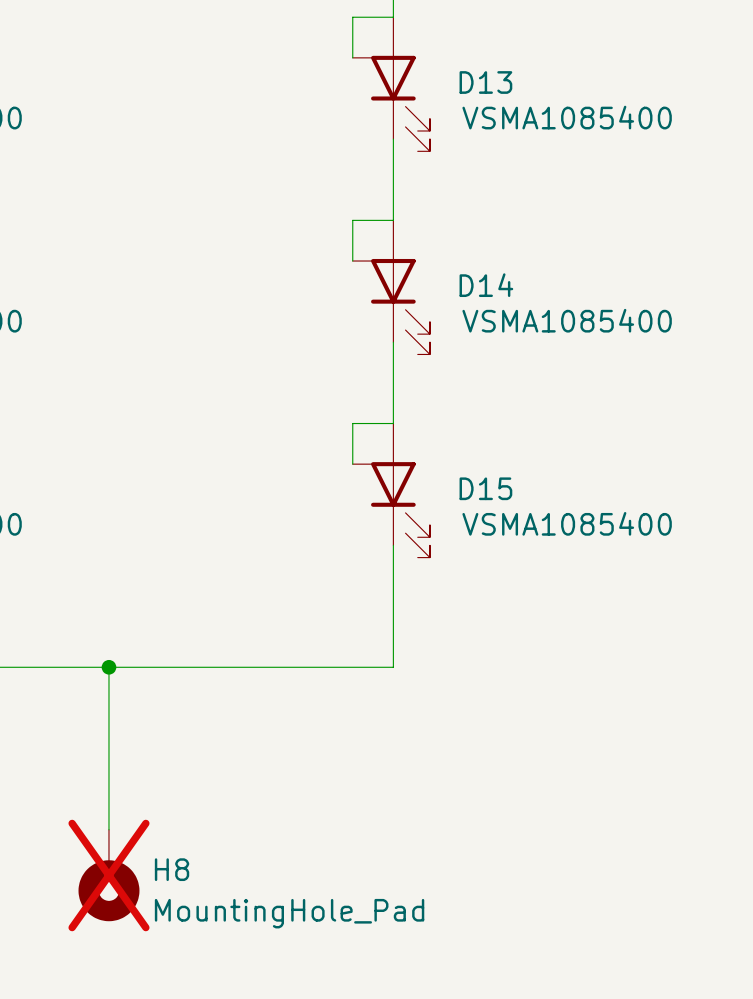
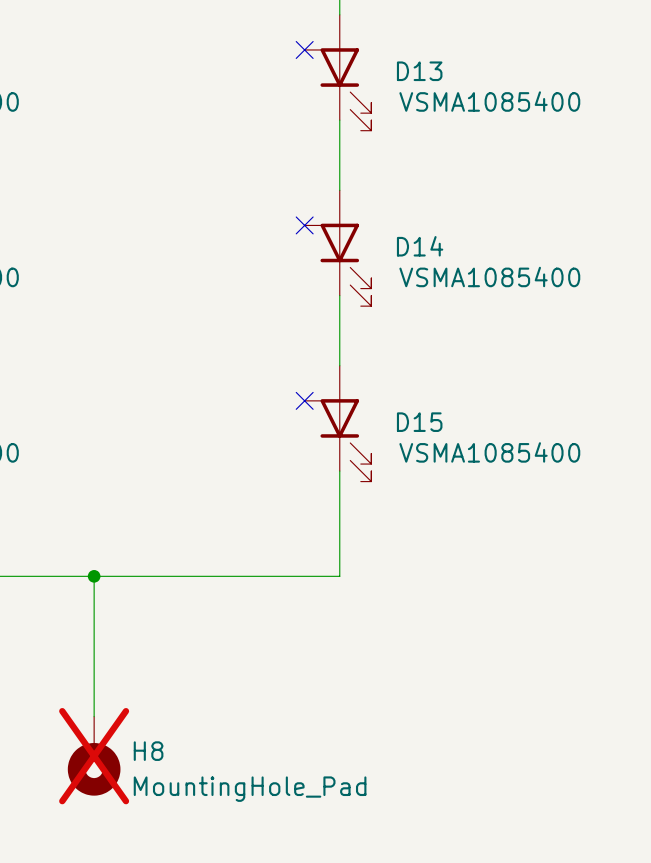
wire: (393, 17) (352, 17) (352, 57) -> none
no-connect mark: none -> (304, 49)
wire: (393, 220) (352, 220) (352, 261) -> none
no-connect mark: none -> (304, 225)
wire: (393, 423) (352, 423) (352, 464) -> none
no-connect mark: none -> (304, 400)

